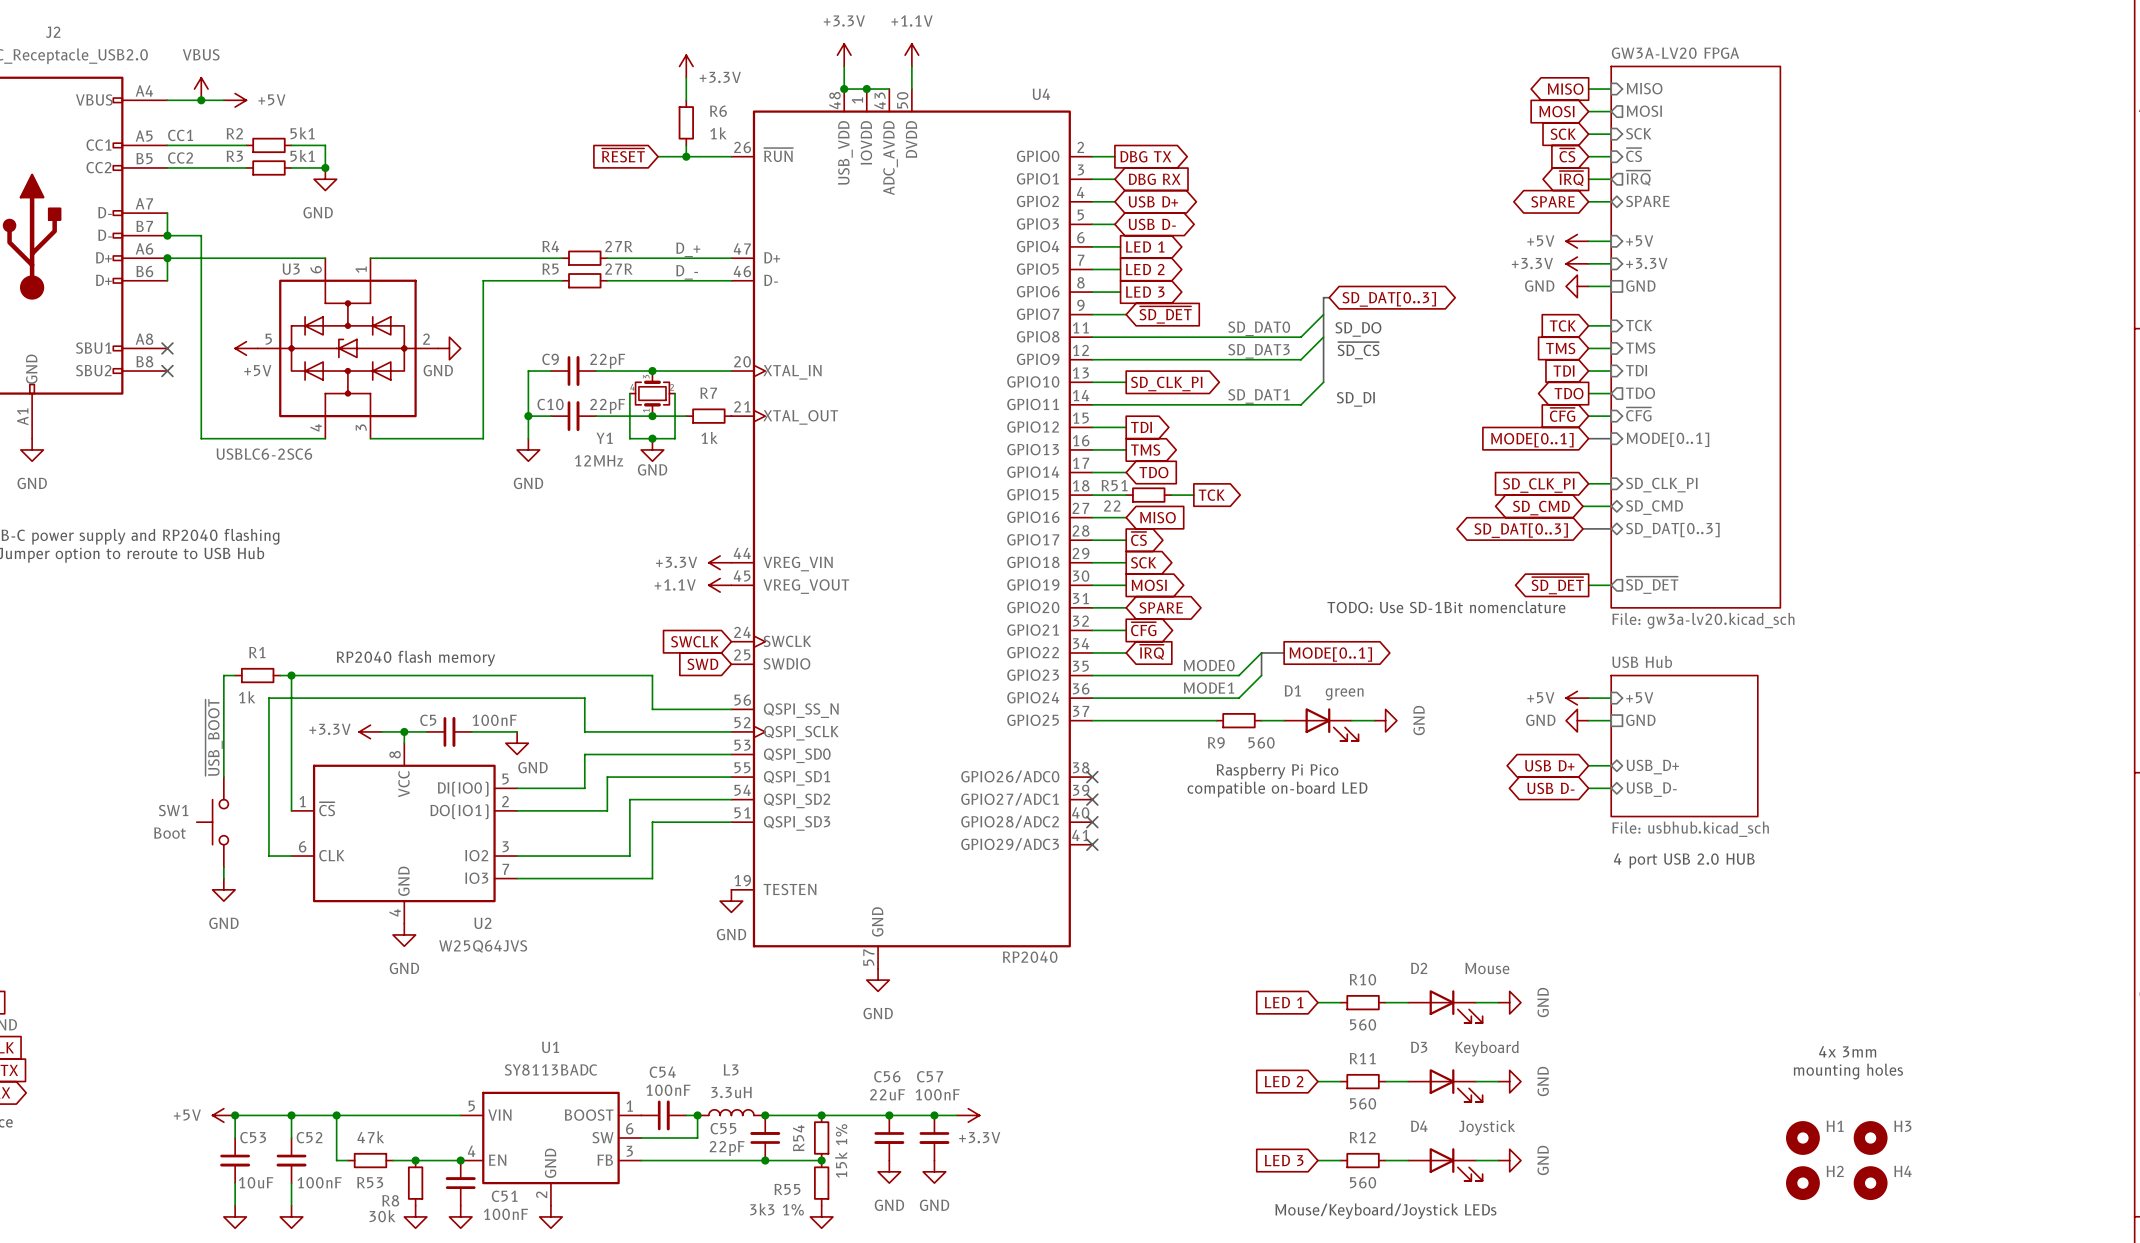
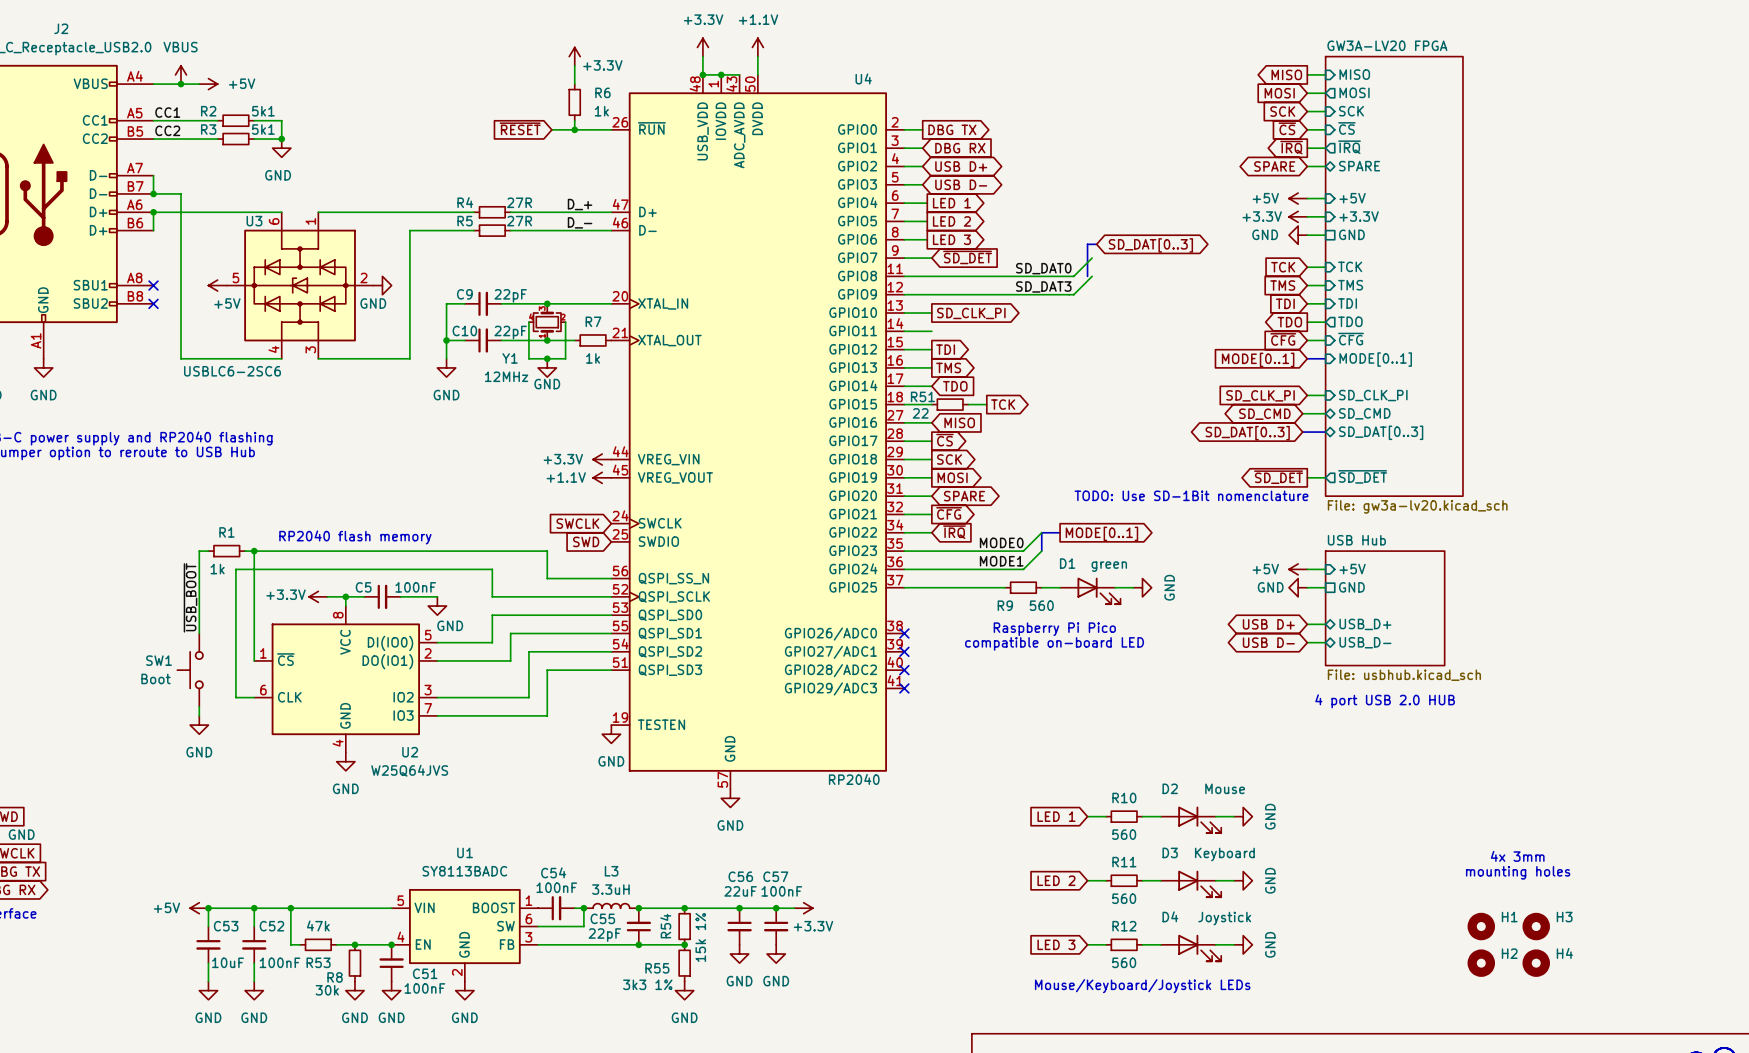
bus: (1323, 297) (1323, 382) -> (1092, 244) (1087, 244) (1087, 276)
text: SD_DO (1358, 329) -> none
text: ~{SD_CS} (1358, 350) -> none
wire: (1323, 382) (1301, 404) (1126, 404) -> none
label: SD_DAT1 (1258, 396) -> none
text: SD_DI (1355, 399) -> none

